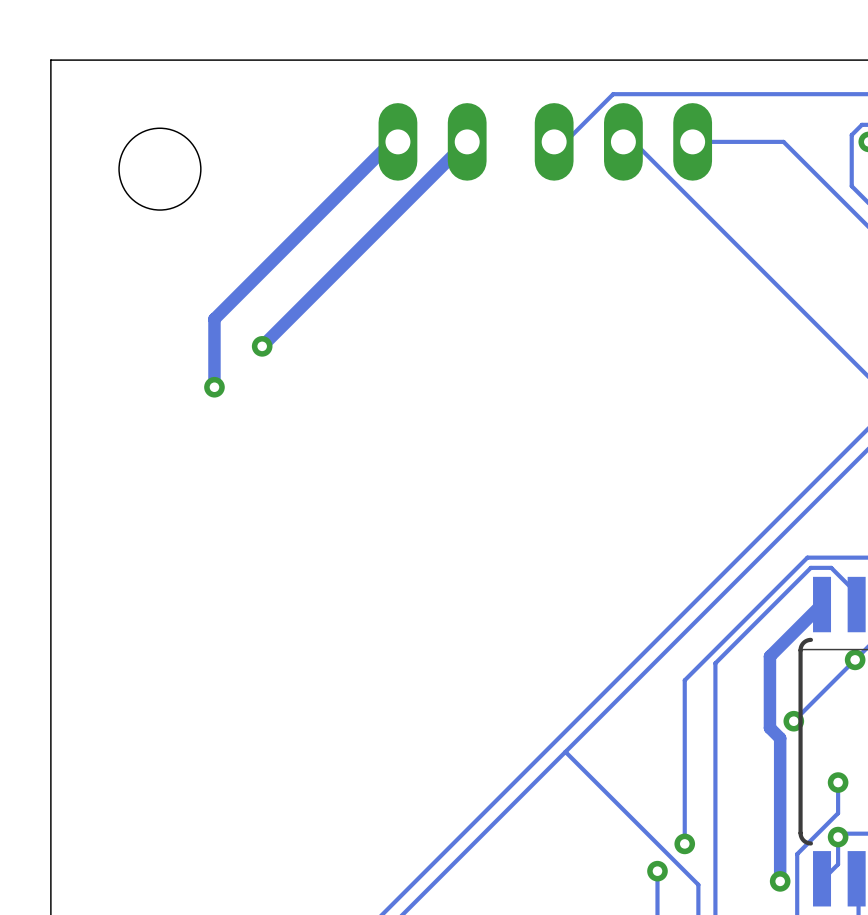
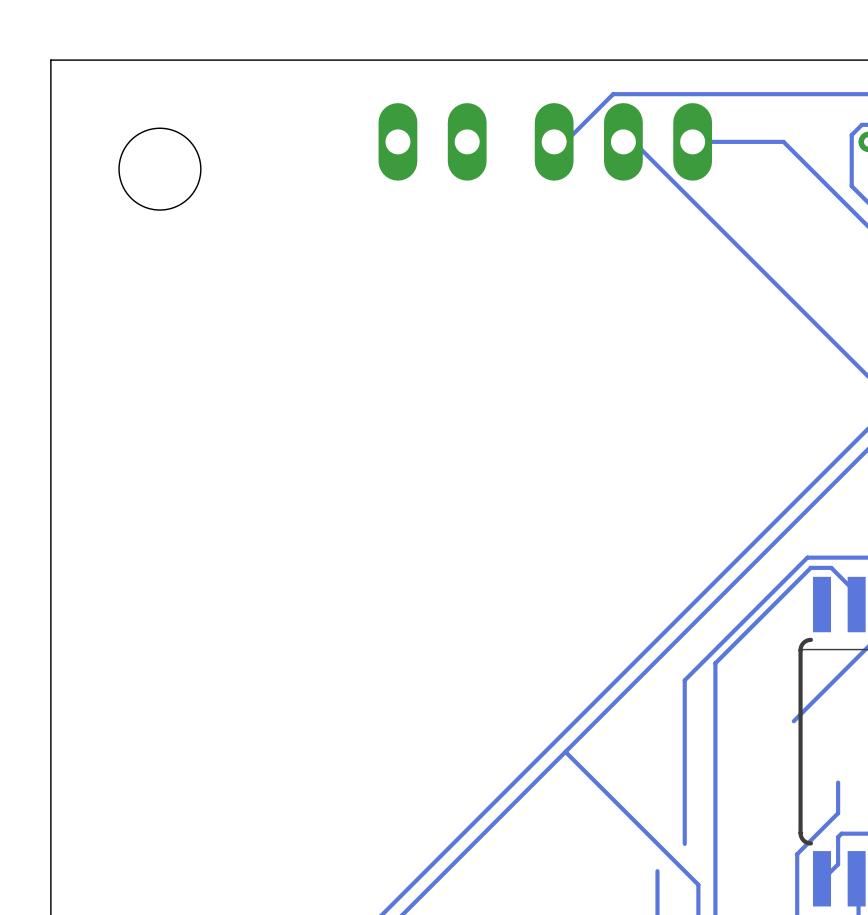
track: (397, 141) (391, 141) (214, 319) (214, 387) -> none
track: (466, 141) (262, 346) -> none
via: (262, 346) -> none
via: (214, 387) -> none
track: (822, 604) (769, 656) (769, 728) (780, 738) (780, 881) -> none
via: (855, 659) -> none
via: (793, 721) -> none
via: (838, 782) -> none
via: (838, 837) -> none
via: (684, 843) -> none
via: (657, 871) -> none
via: (780, 881) -> none

